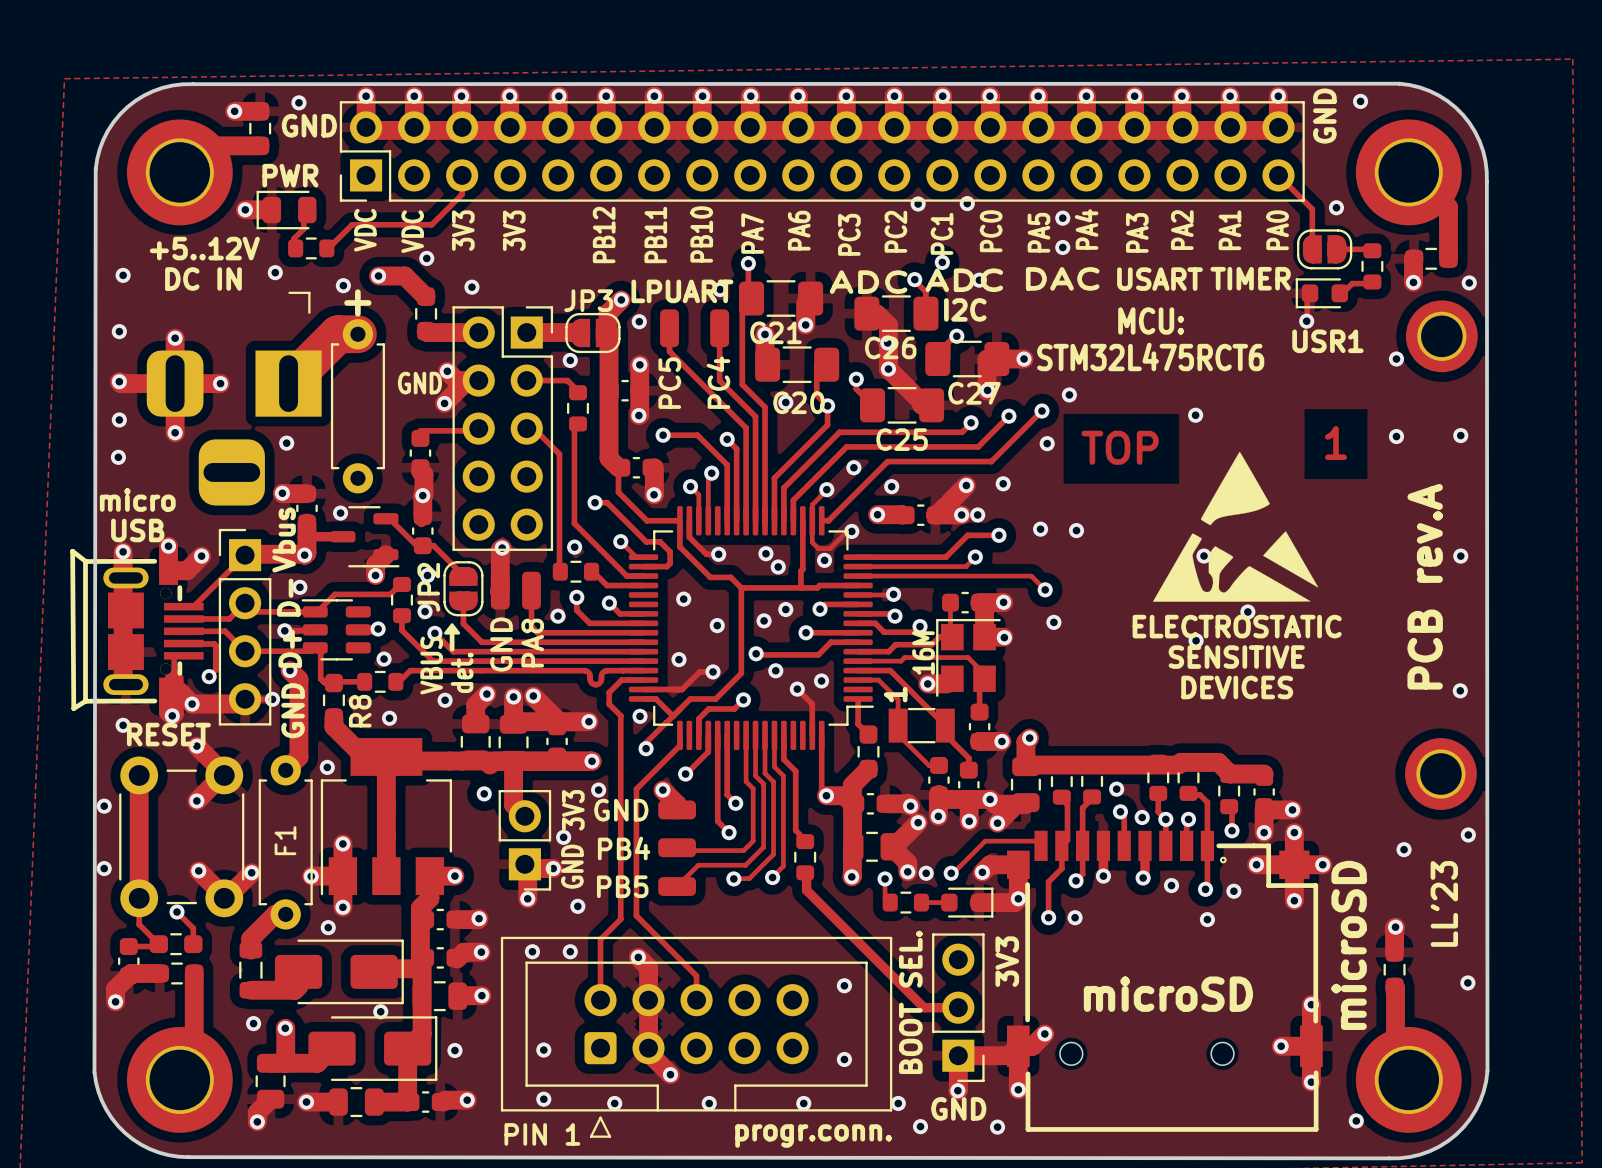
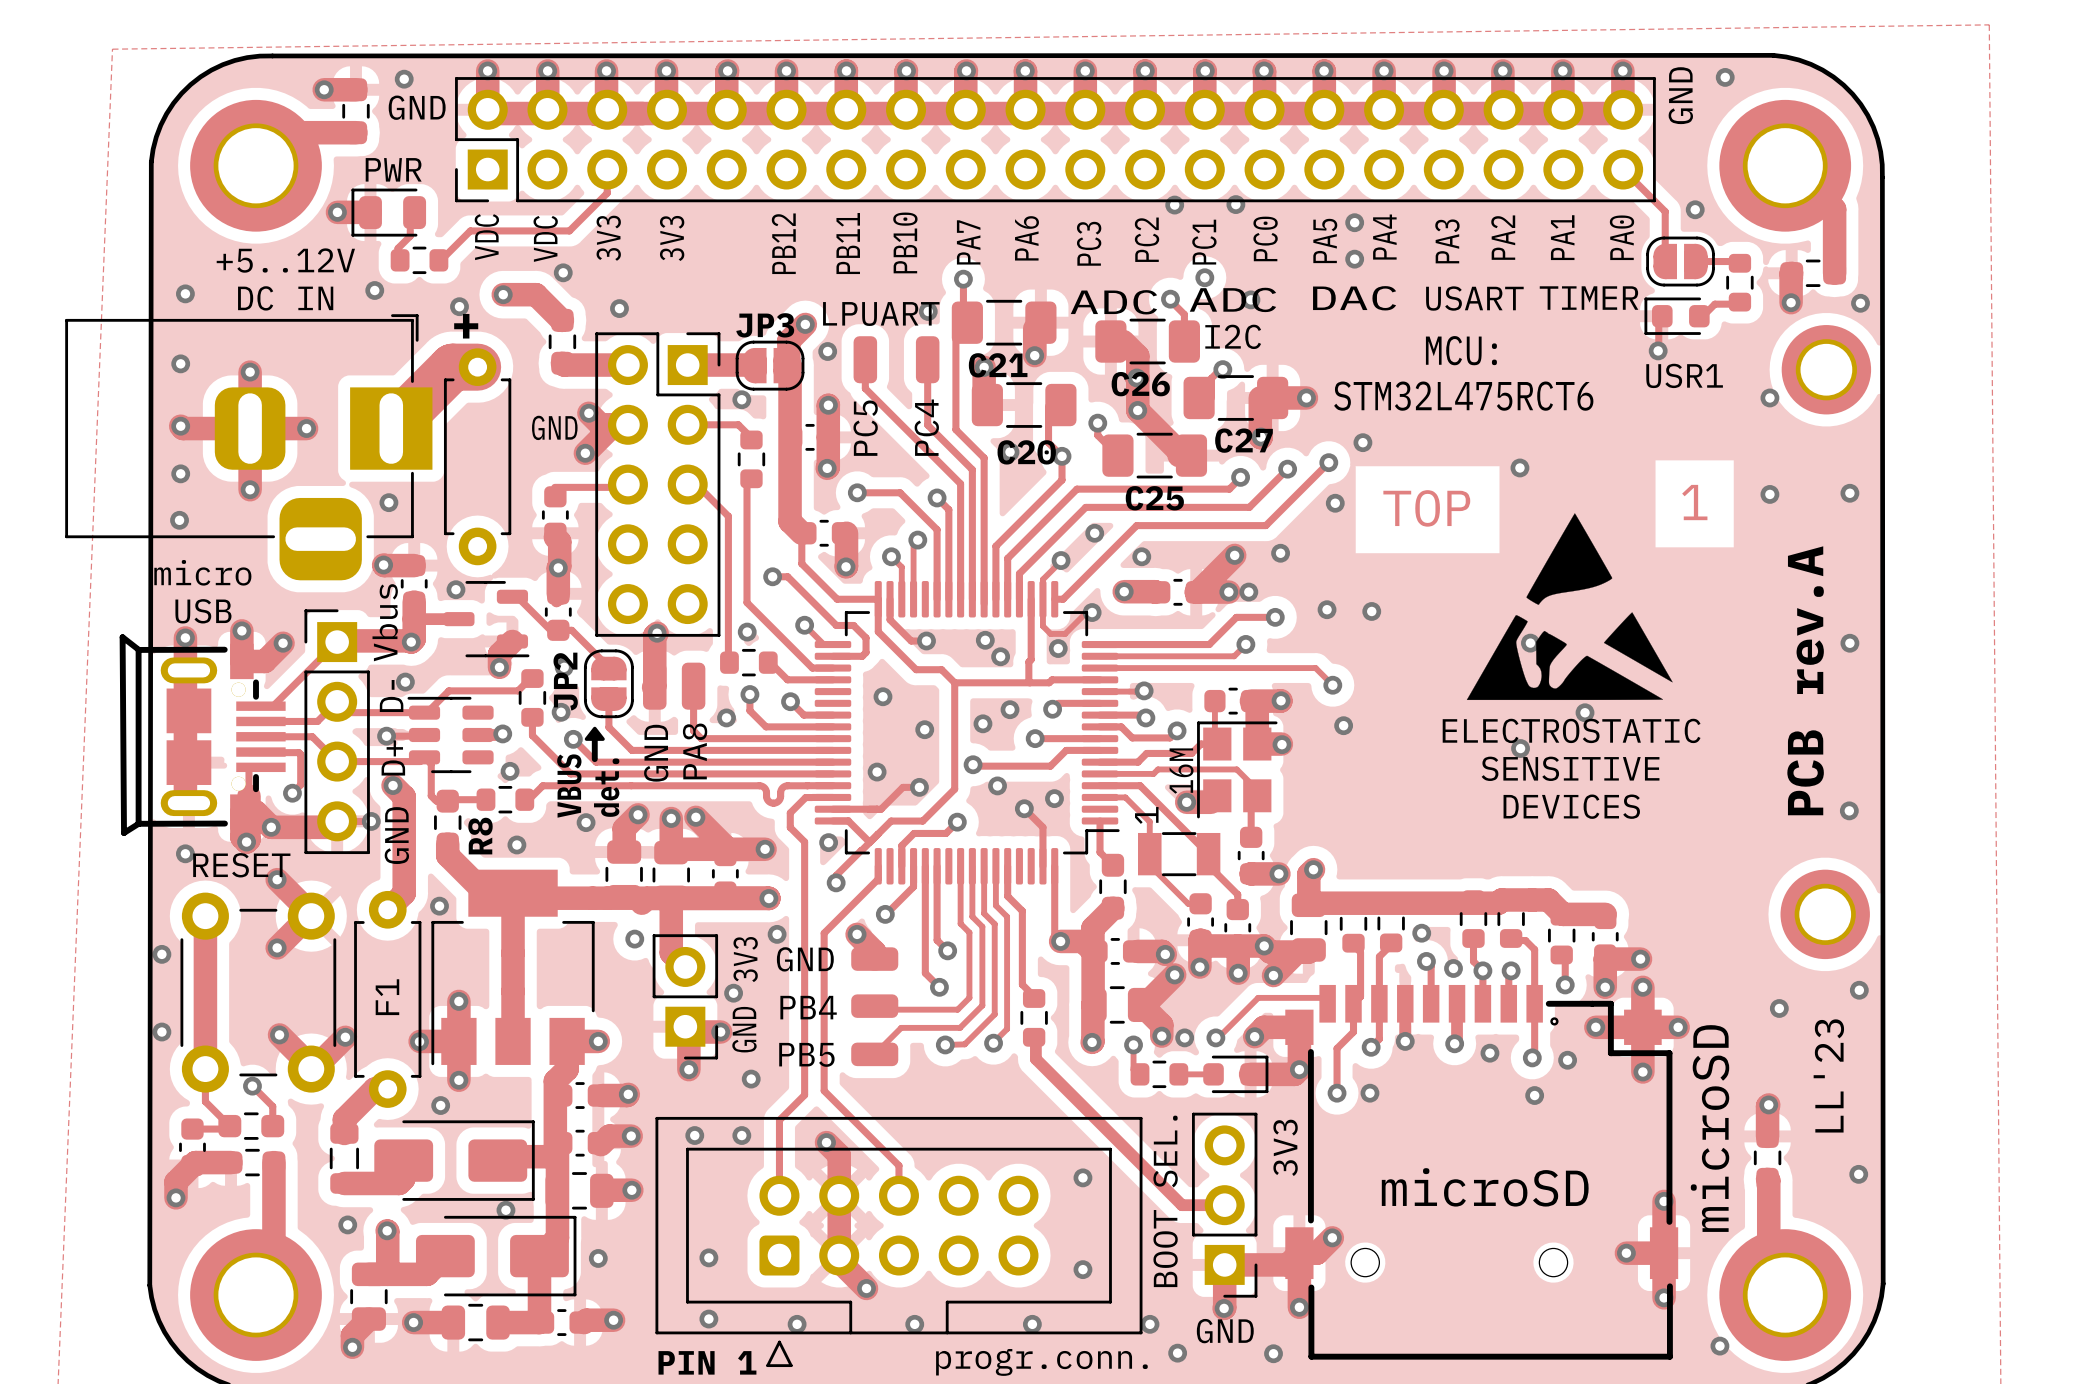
part: none -> (248, 447)
part: (234, 398) -> none

